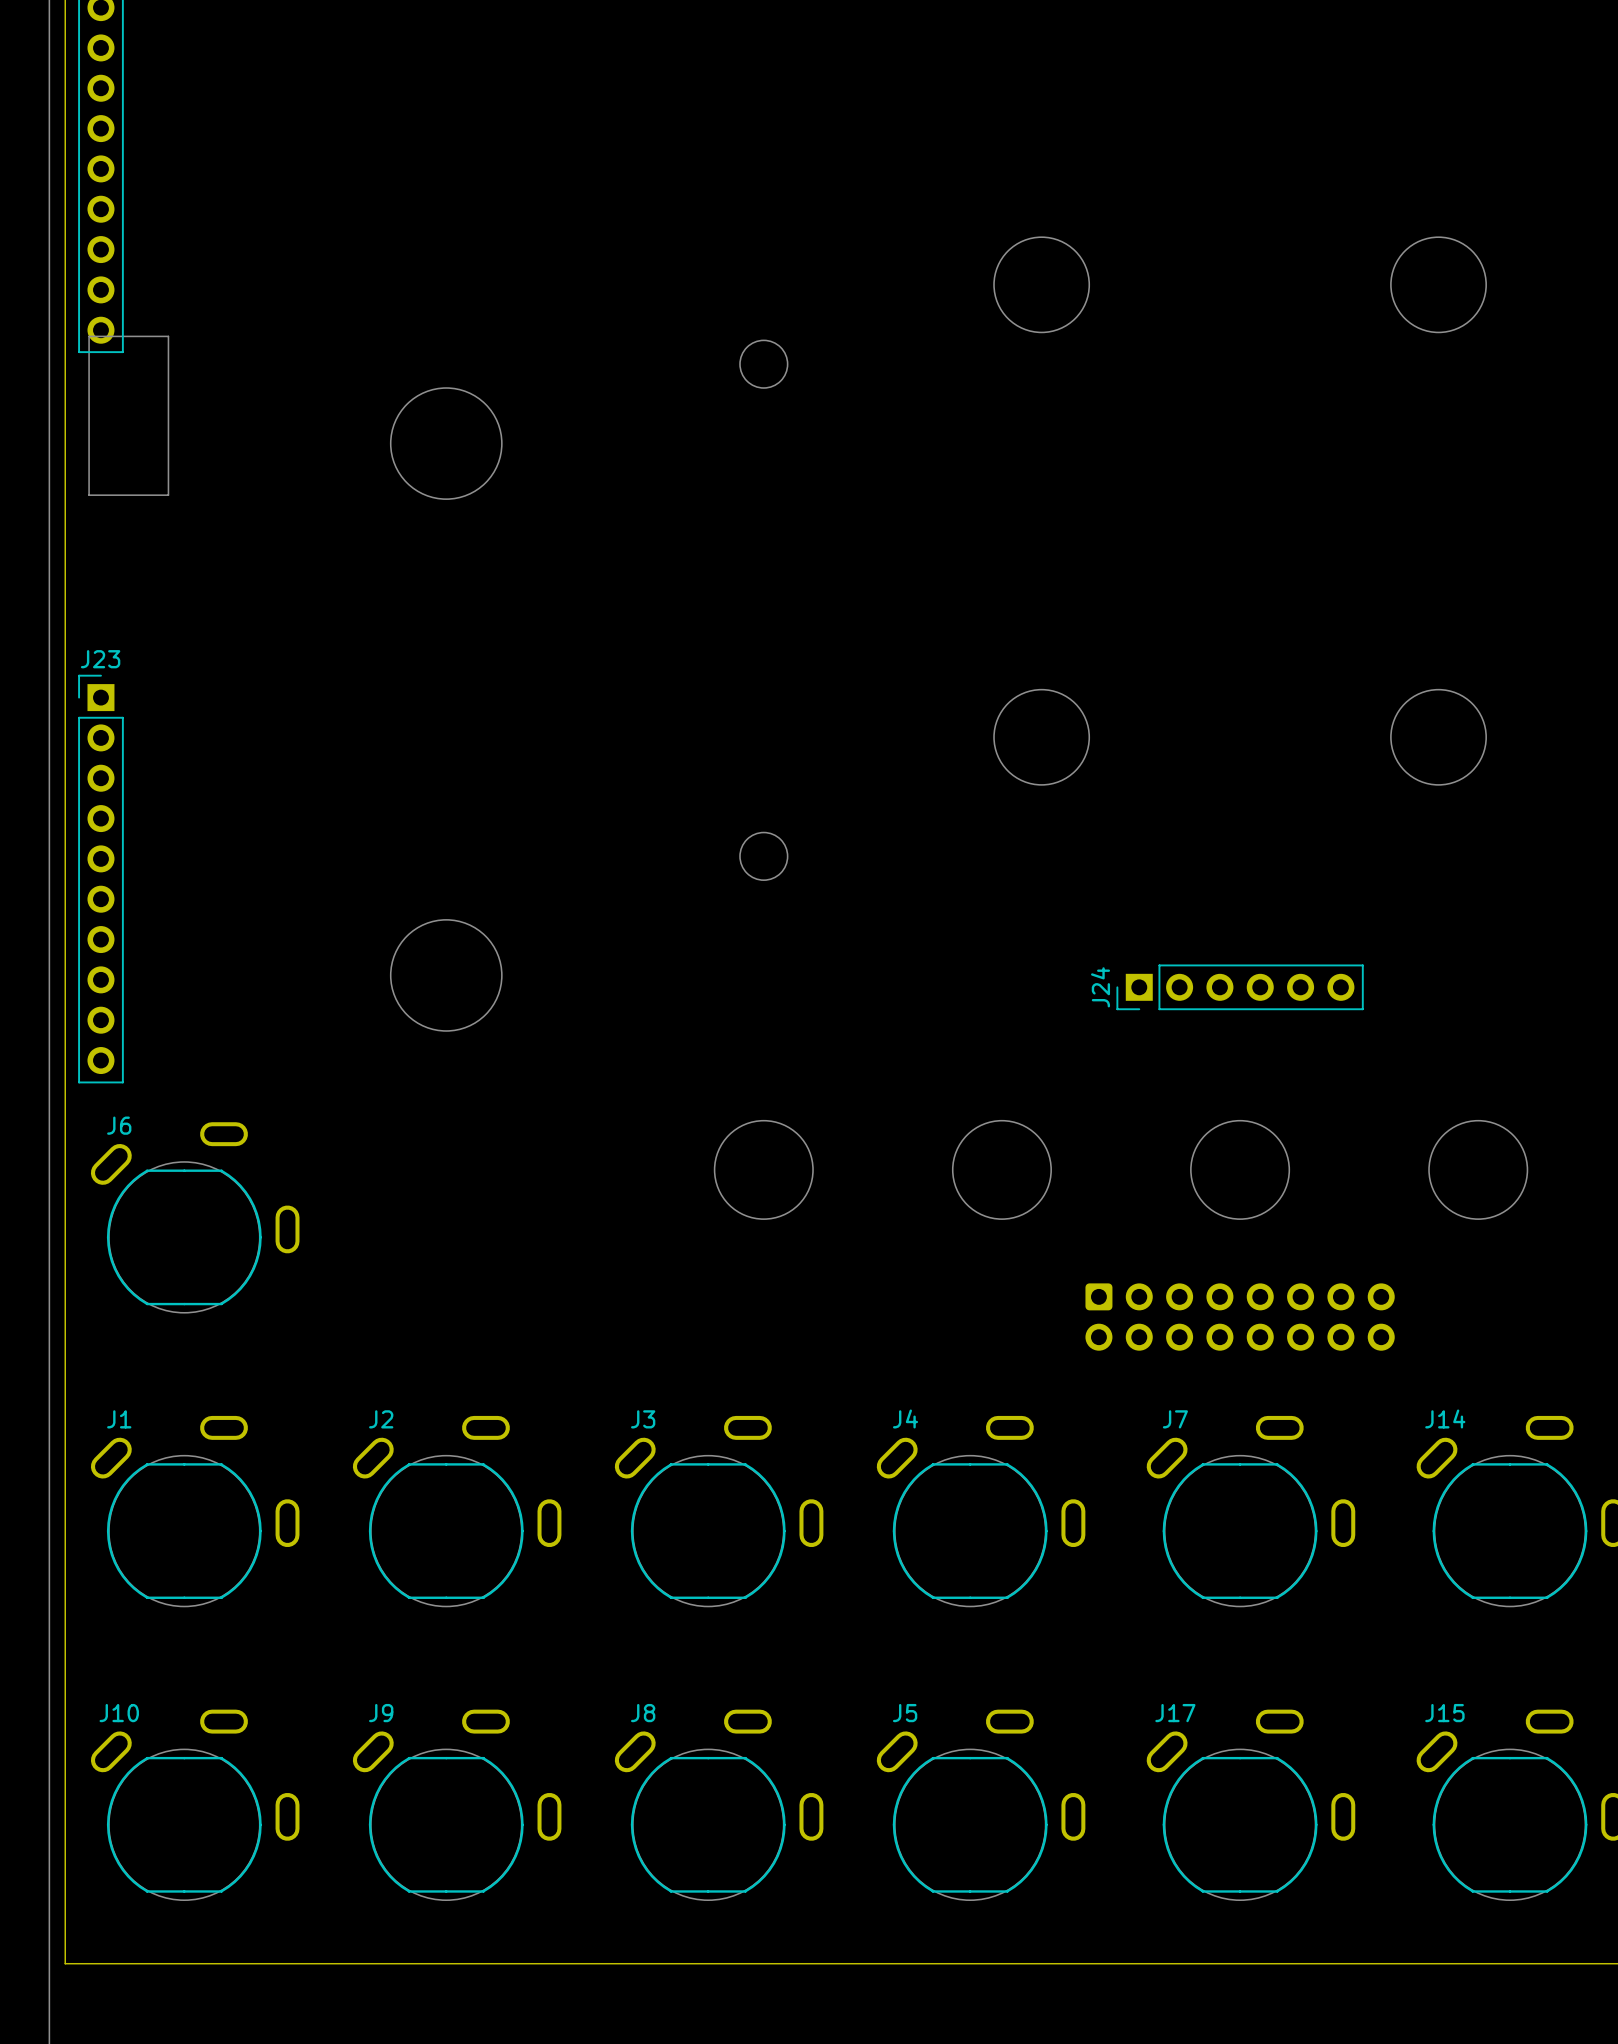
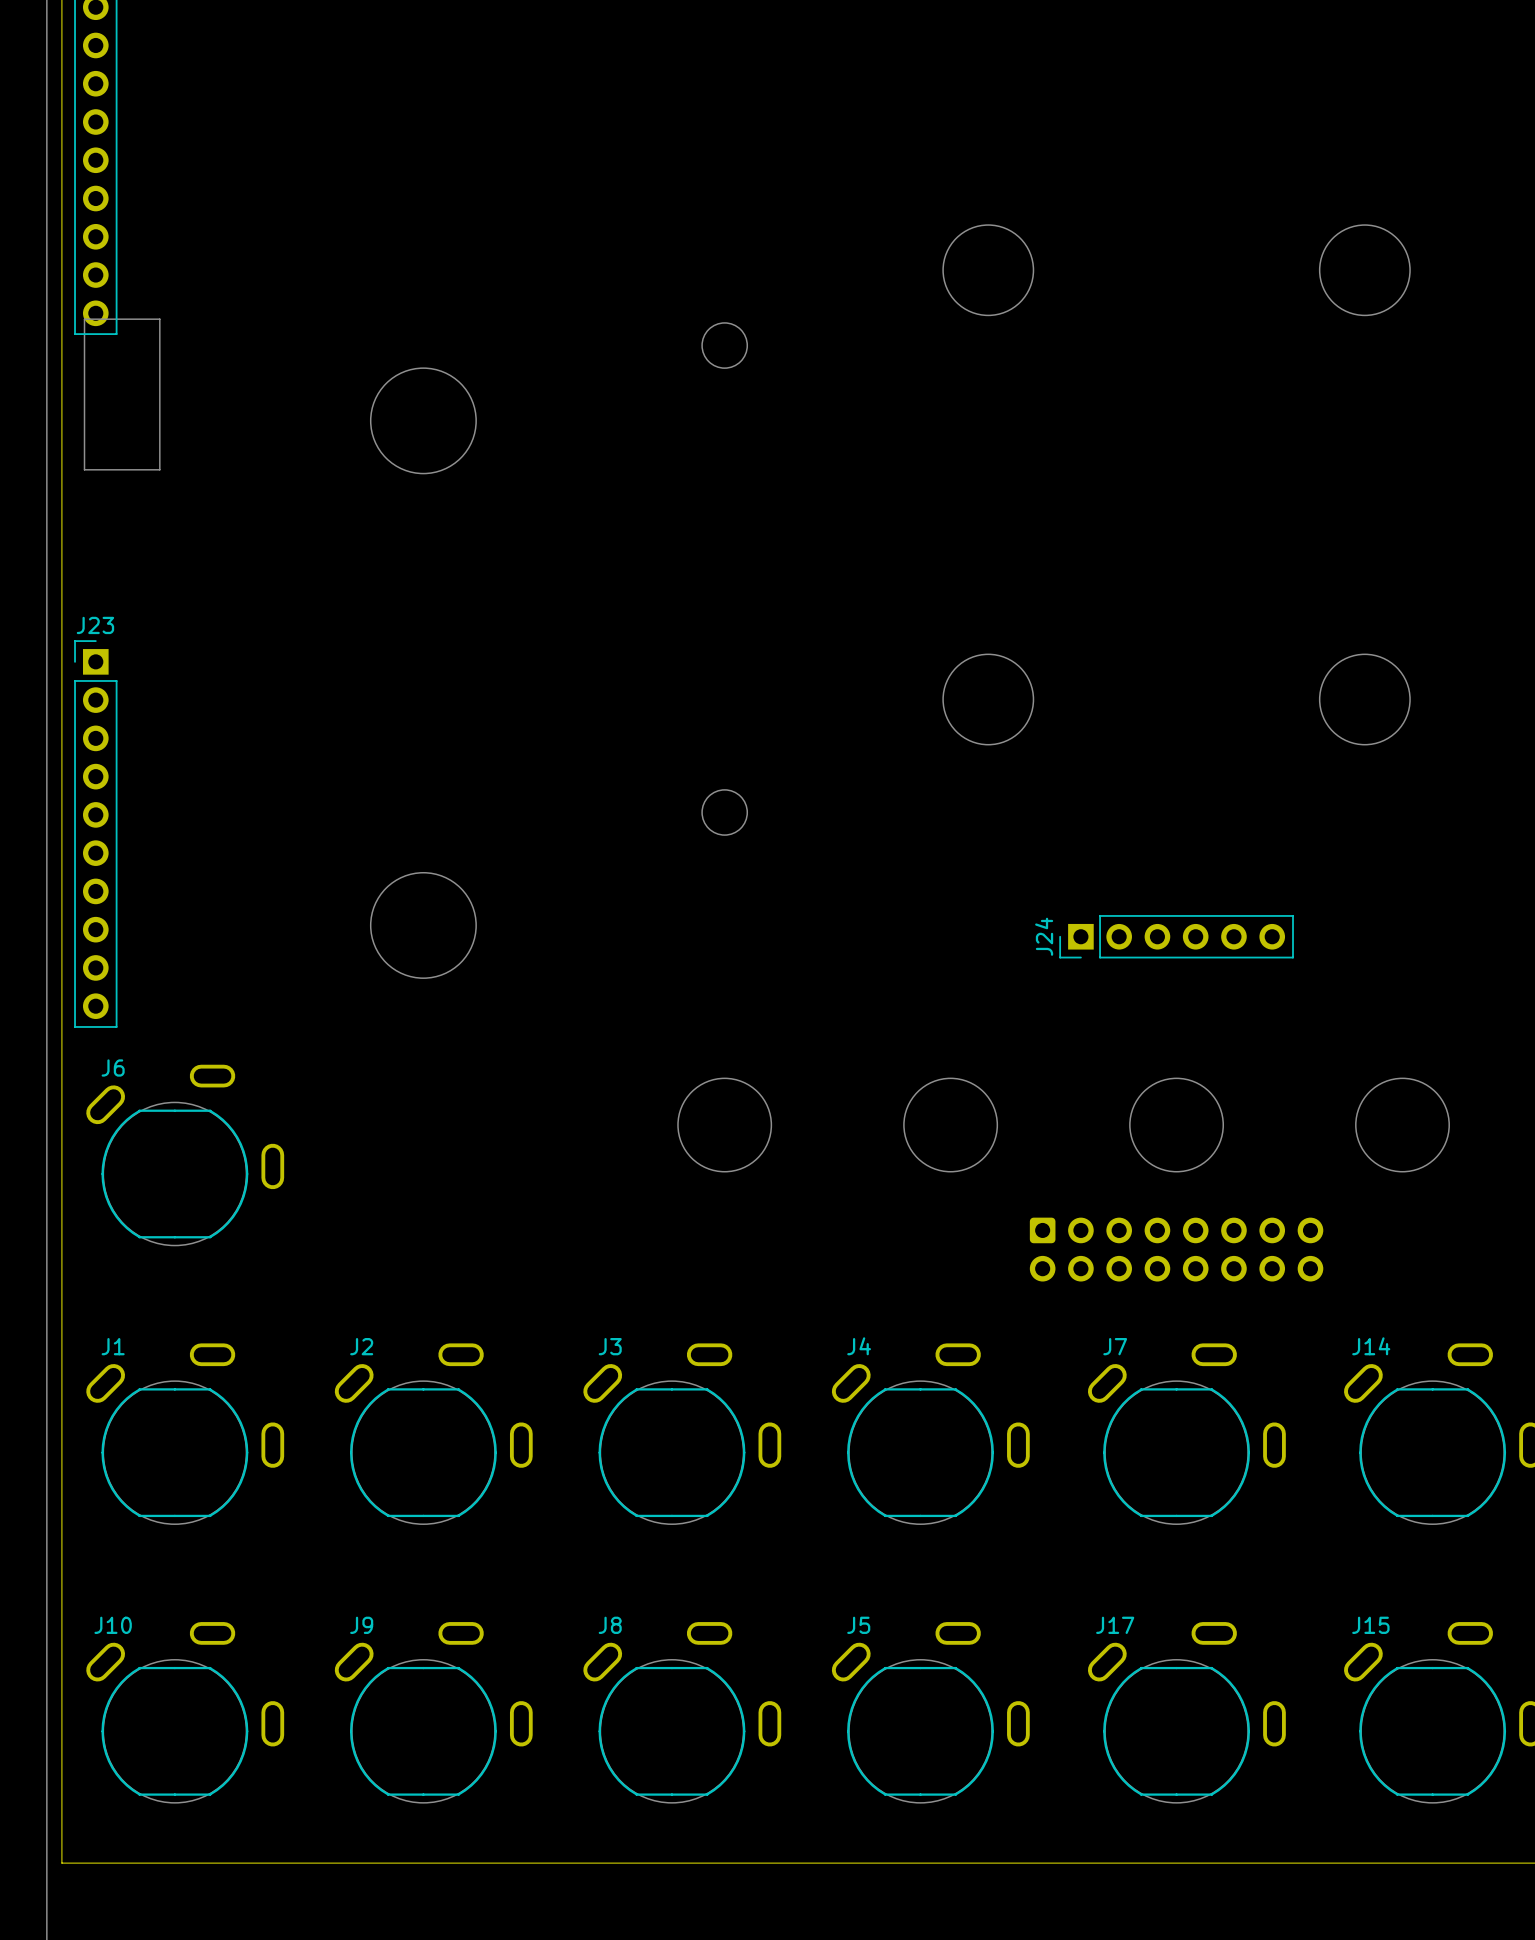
drawing position: (763, 1169) -> (724, 1125)
drawing position: (1001, 1169) -> (950, 1125)
drawing position: (1240, 1169) -> (1176, 1125)
drawing position: (1478, 1169) -> (1402, 1125)

